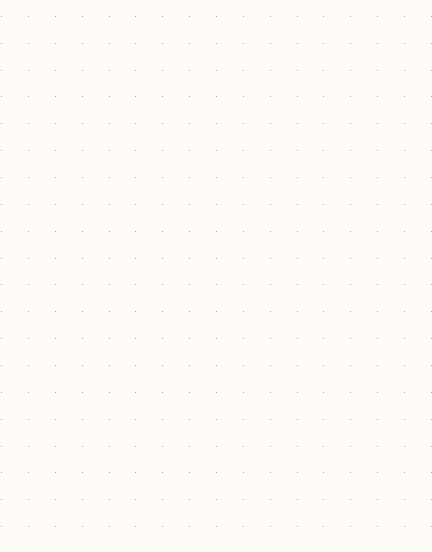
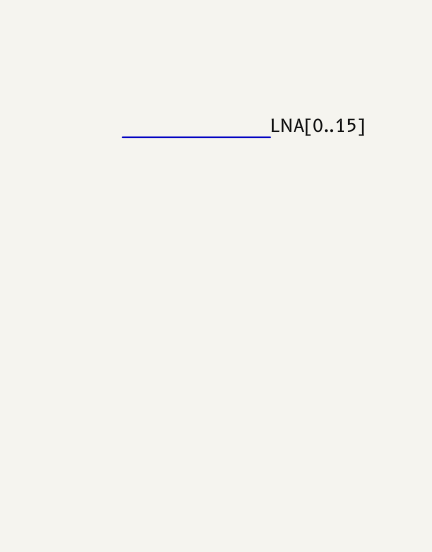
label: none -> LNA[0..15] (317, 127)
bus: none -> (122, 137) (270, 137)

